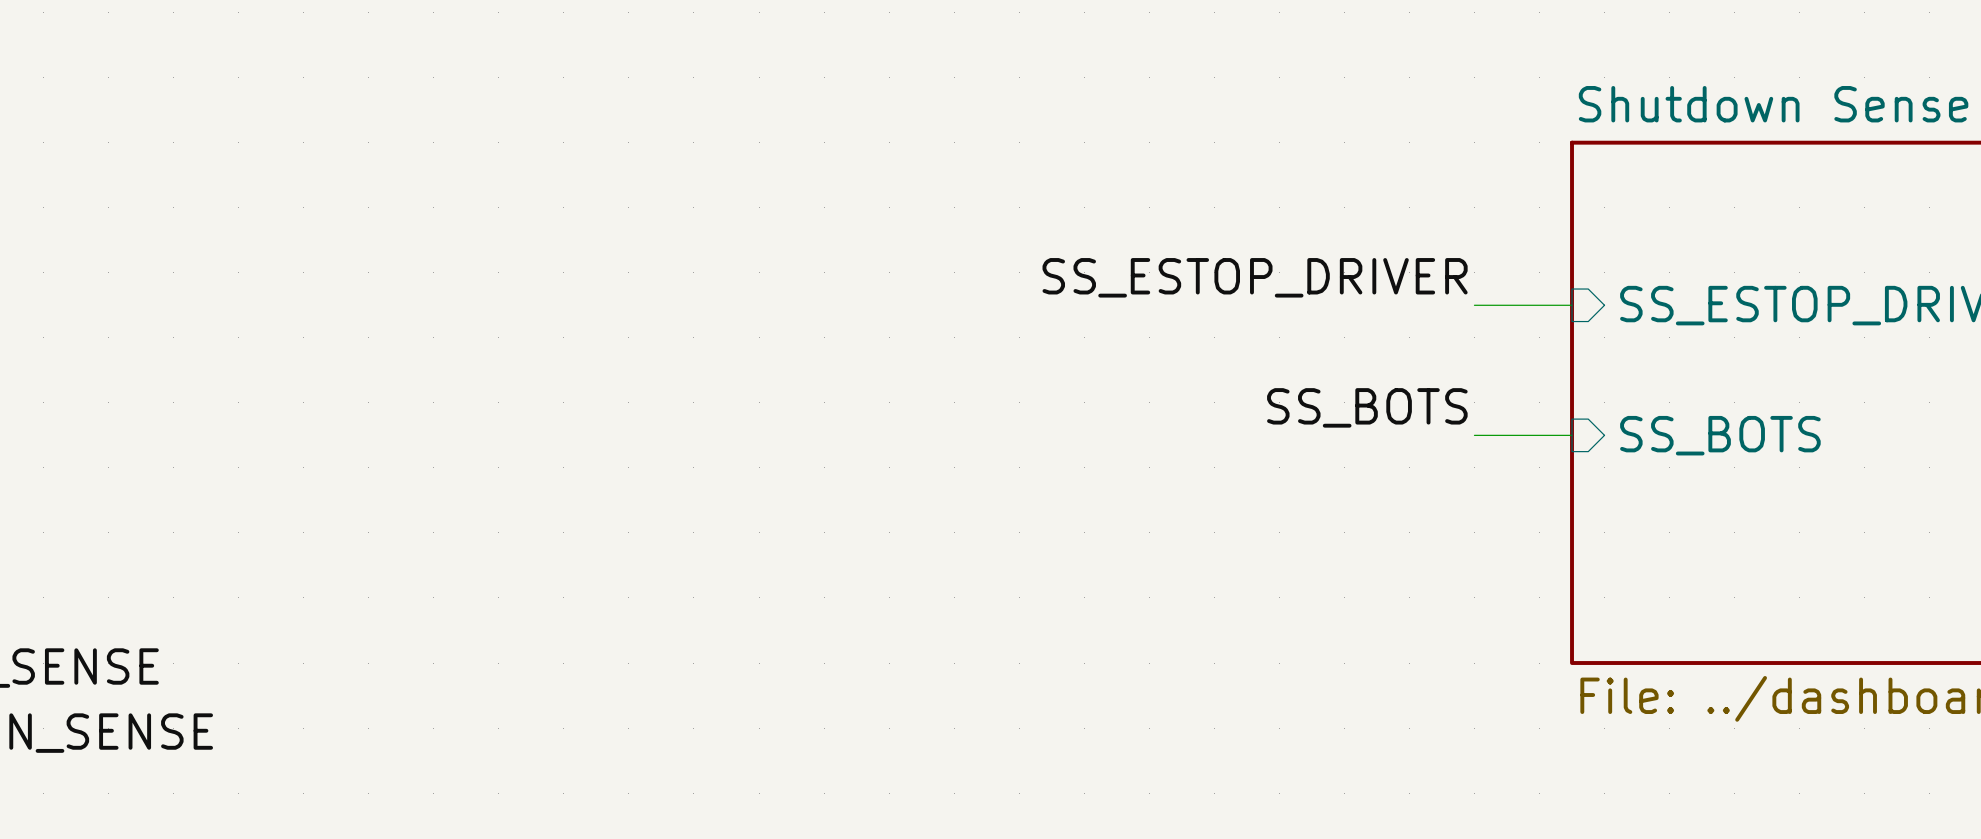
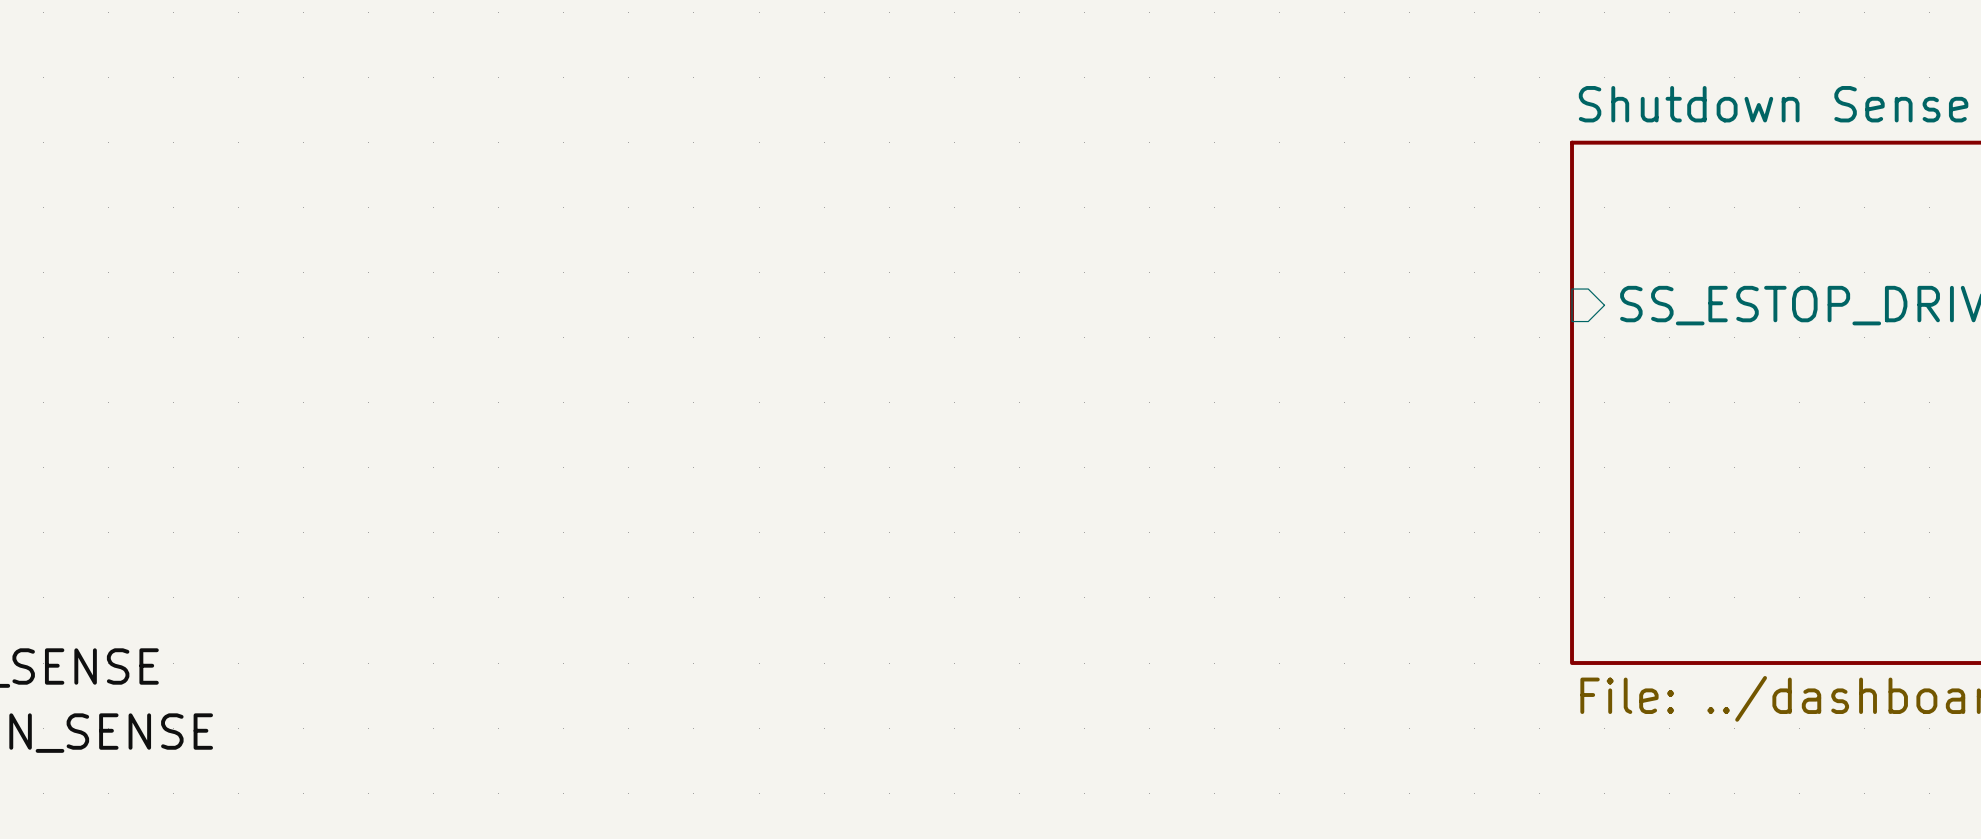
label: SS_ESTOP_DRIVER (1255, 277) -> none
wire: (1474, 305) (1572, 305) -> none
label: SS_BOTS (1367, 407) -> none
wire: (1474, 435) (1572, 435) -> none
sheet pin: SS_BOTS (1720, 435) -> none

